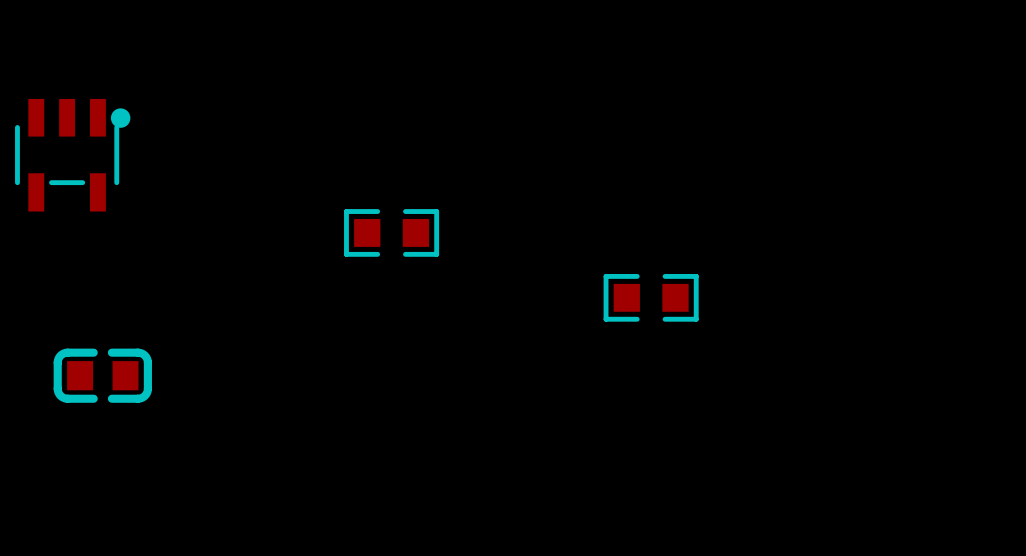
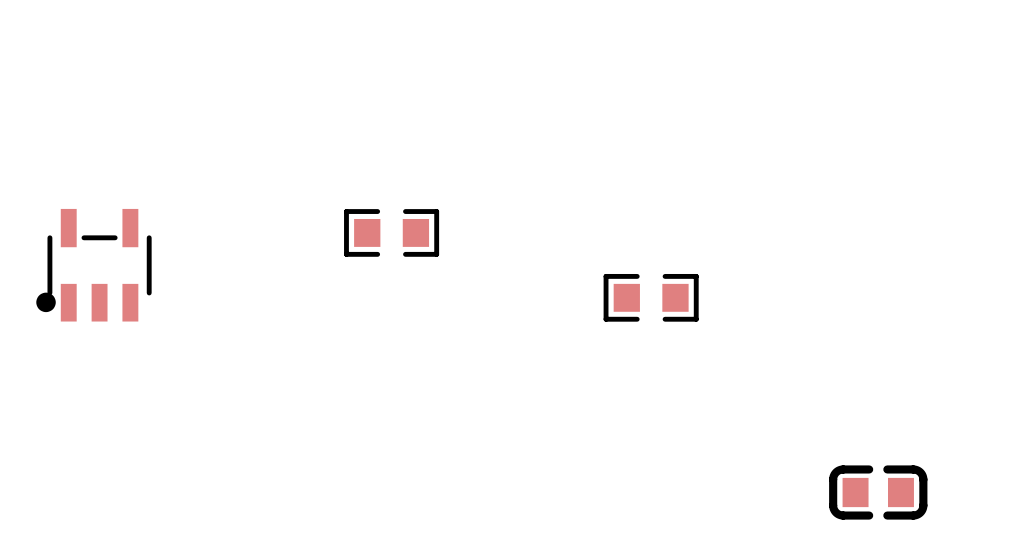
part rotation: 0° (72, 155) -> 180° (93, 265)
part position: (72, 155) -> (93, 265)
part position: (102, 375) -> (878, 492)

